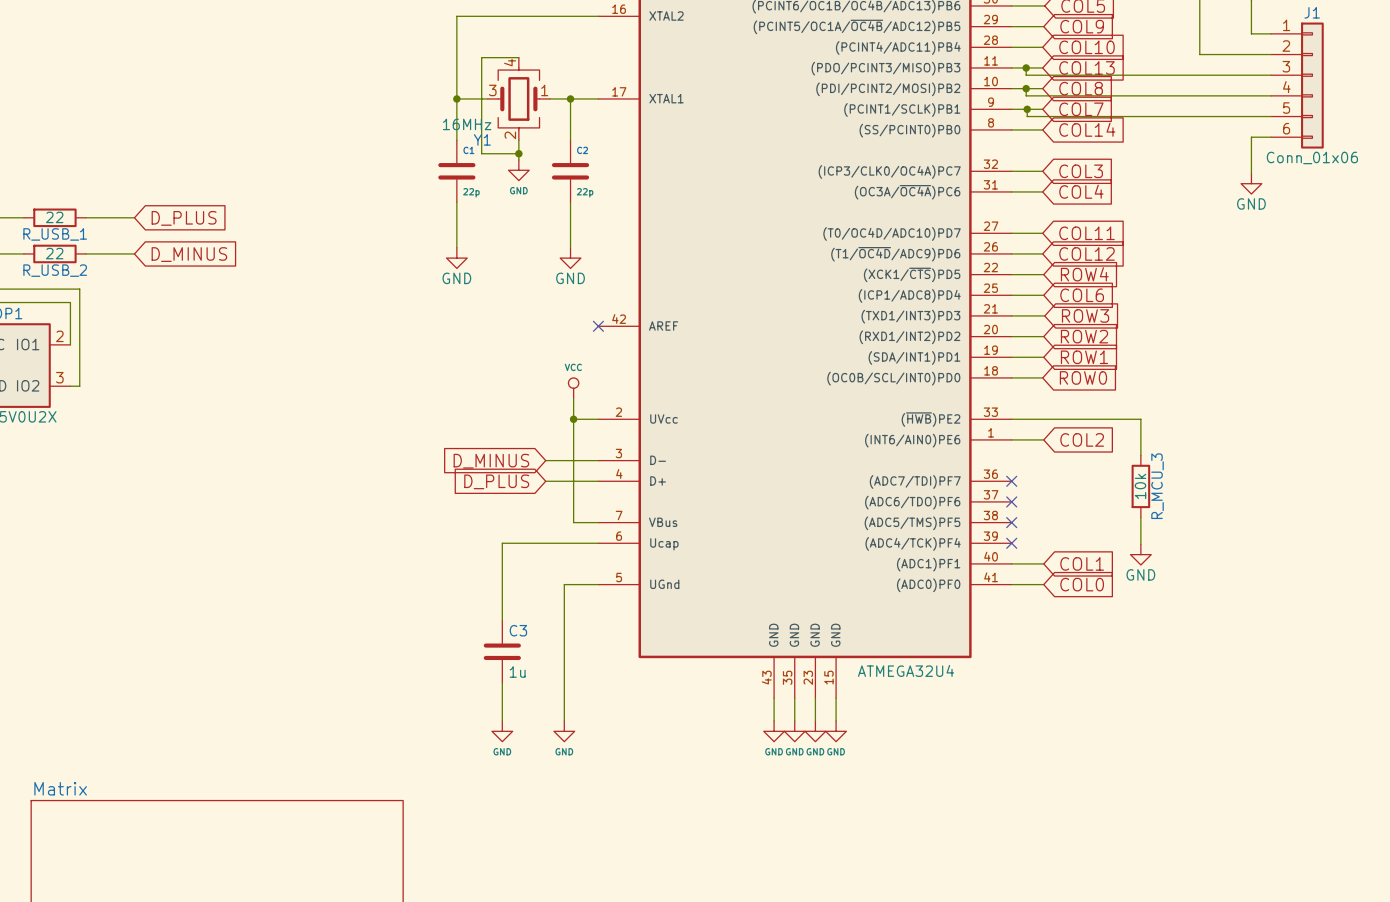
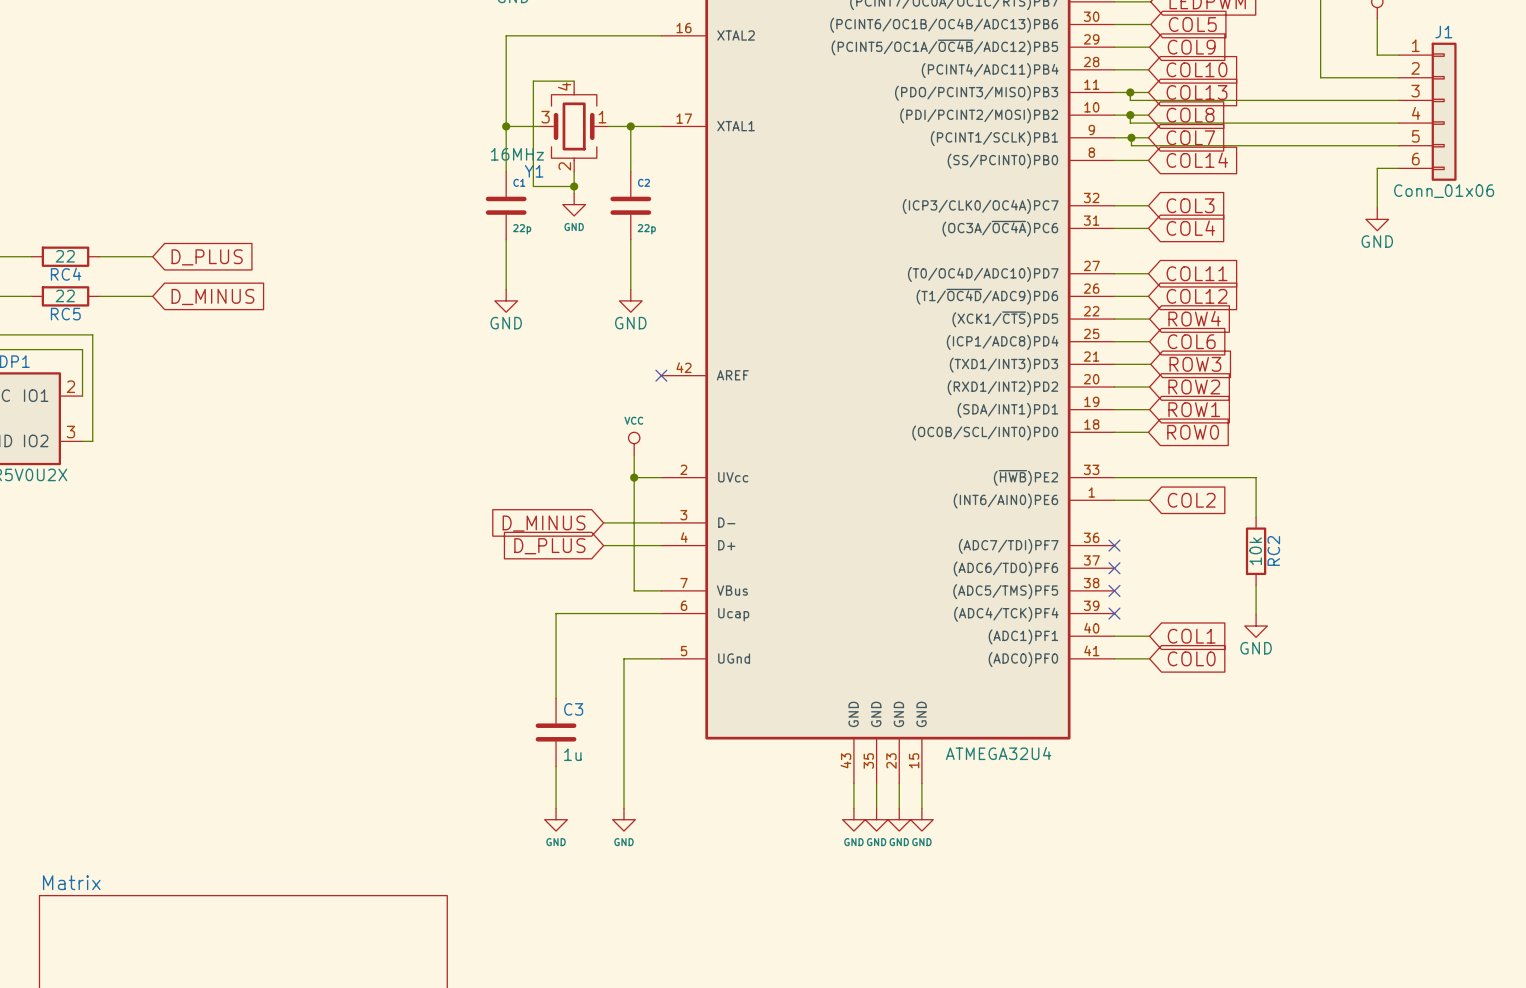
R_USB_1 name: R_USB_1 (55, 234) -> RC4 (66, 274)
R_USB_2 name: R_USB_2 (55, 270) -> RC5 (65, 314)
R_MCU_3 name: R_MCU_3 (1157, 486) -> RC2 (1273, 550)

